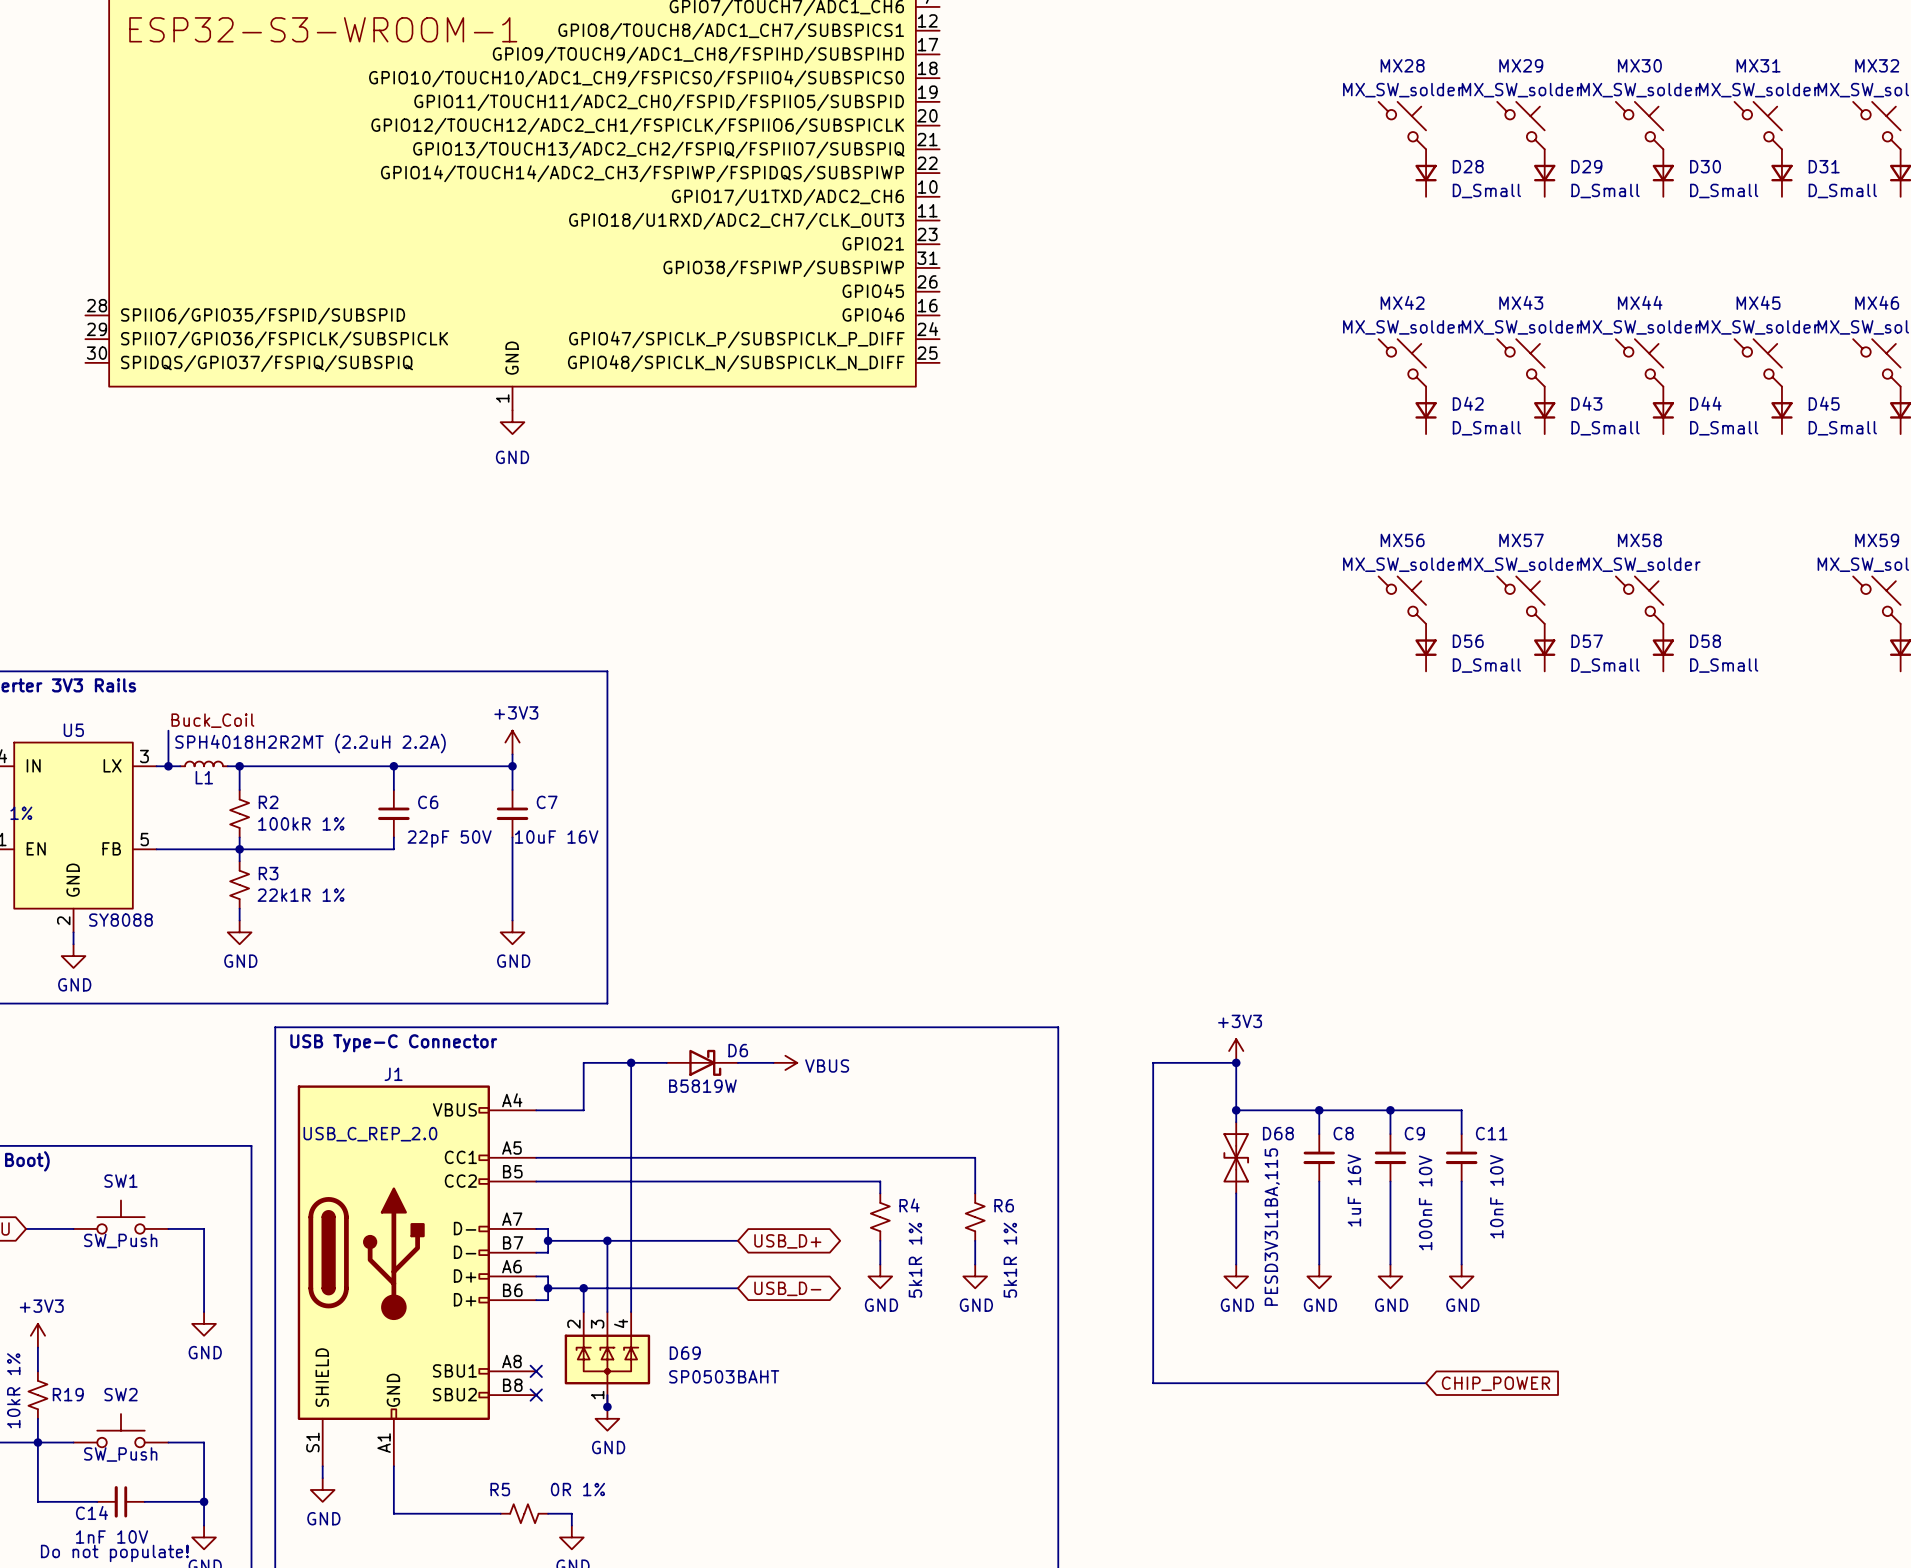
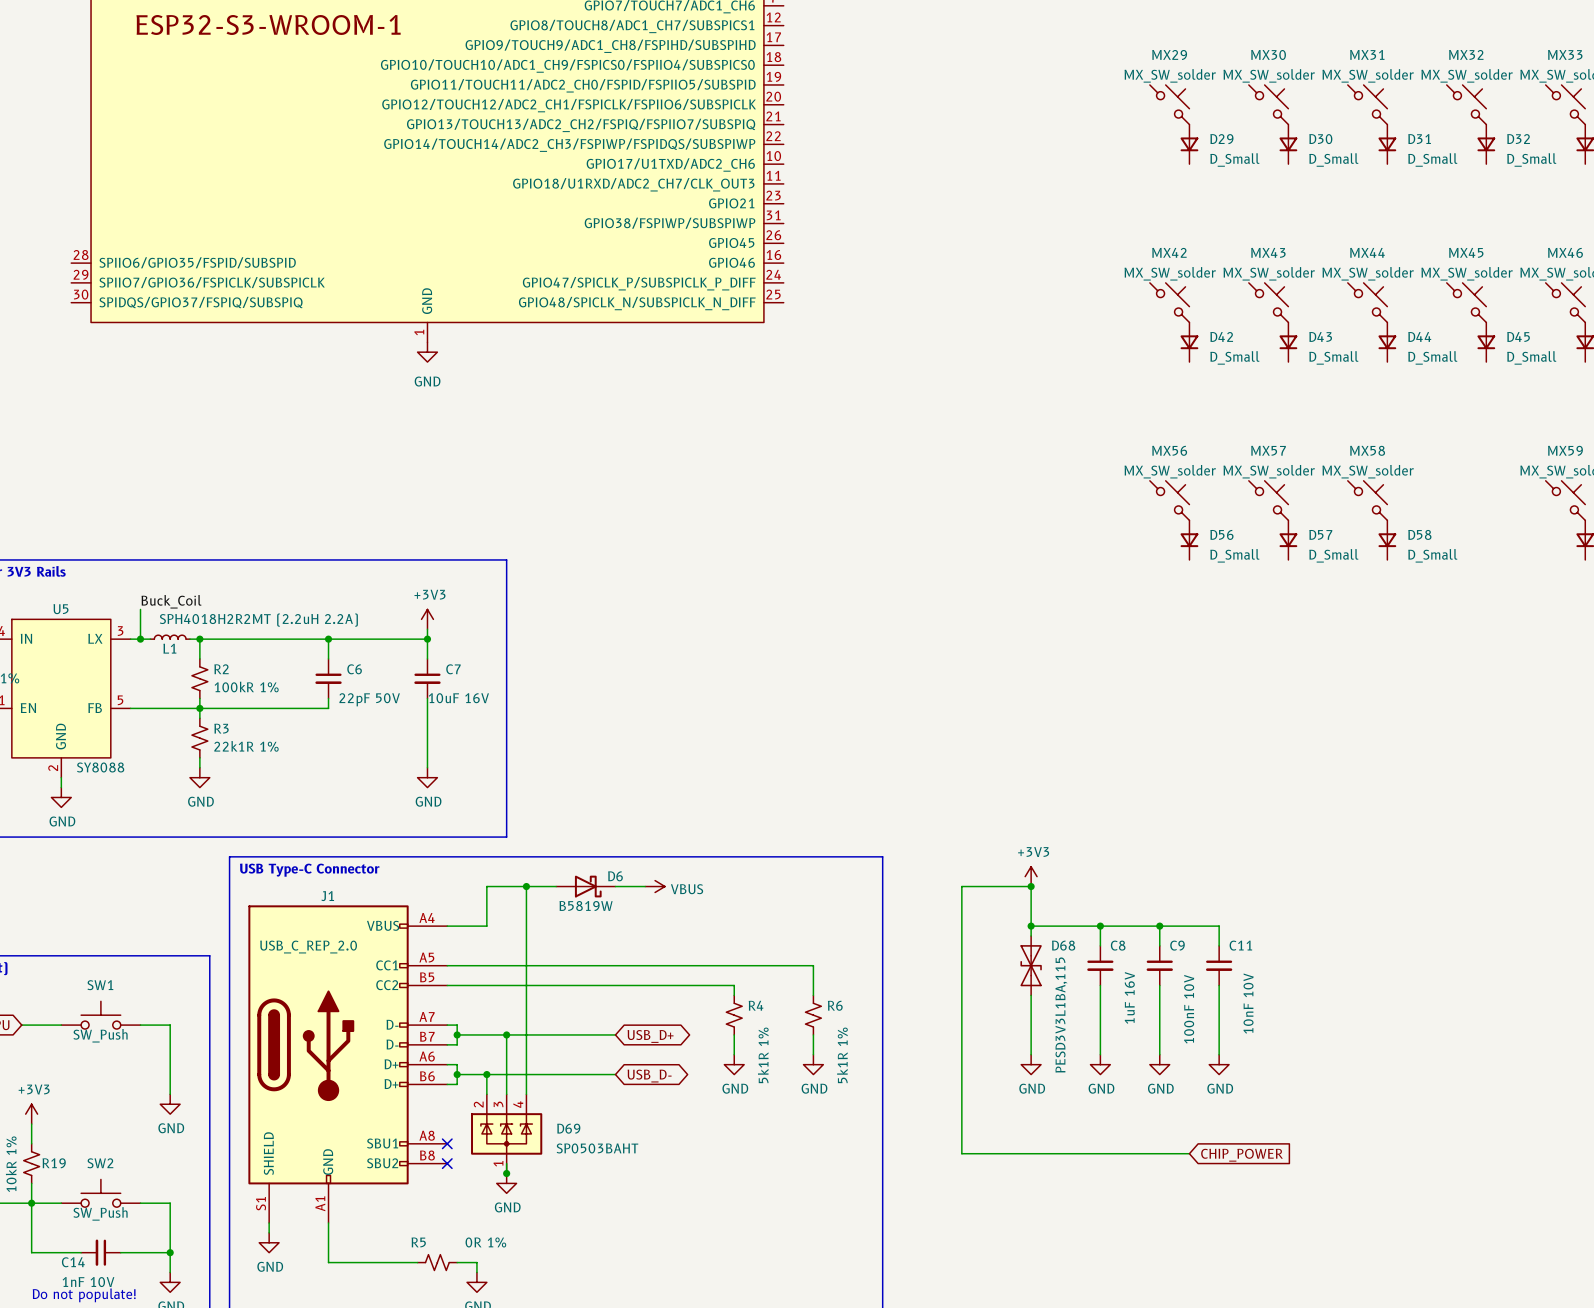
MX28 name: MX28 (1402, 65) -> MX29 (1169, 54)
MX29 name: MX29 (1521, 65) -> MX30 (1268, 54)
MX30 name: MX30 (1639, 65) -> MX31 (1367, 54)
MX31 name: MX31 (1758, 65) -> MX32 (1466, 54)
MX32 name: MX32 (1877, 65) -> MX33 (1565, 54)
D28 name: D28 (1468, 166) -> D29 (1221, 139)
D29 name: D29 (1586, 166) -> D30 (1320, 139)
D30 name: D30 (1705, 166) -> D31 (1419, 139)
D31 name: D31 (1824, 166) -> D32 (1518, 139)

